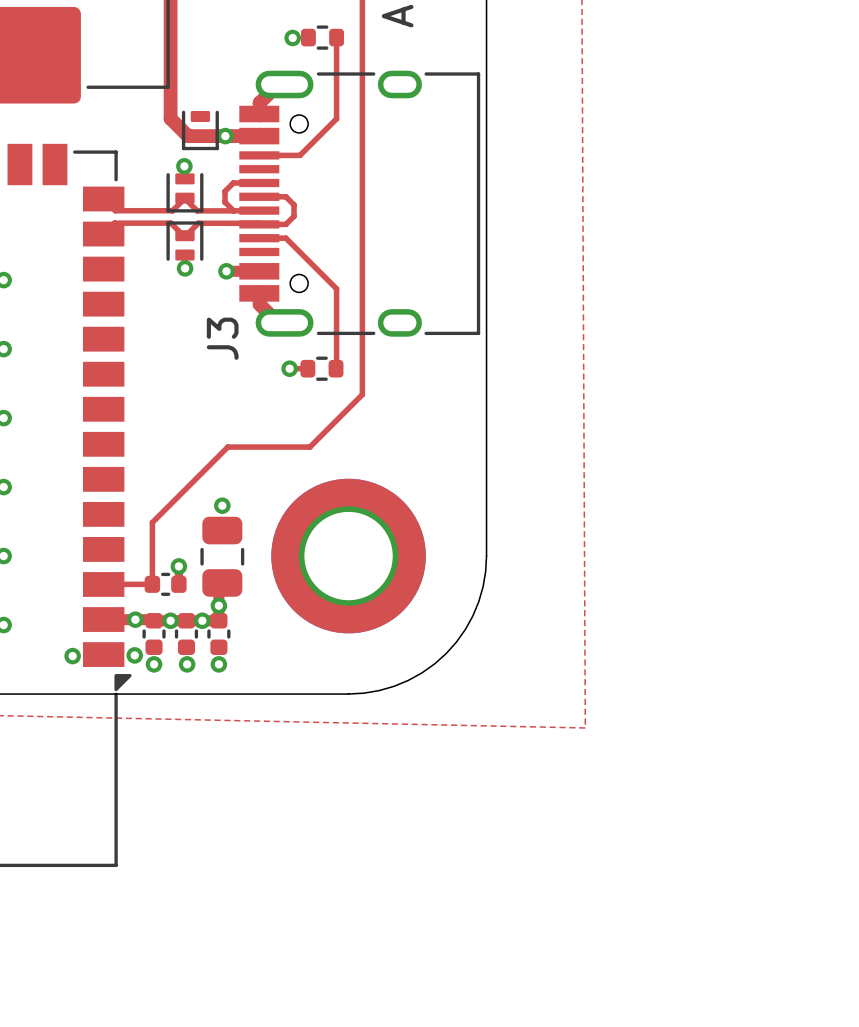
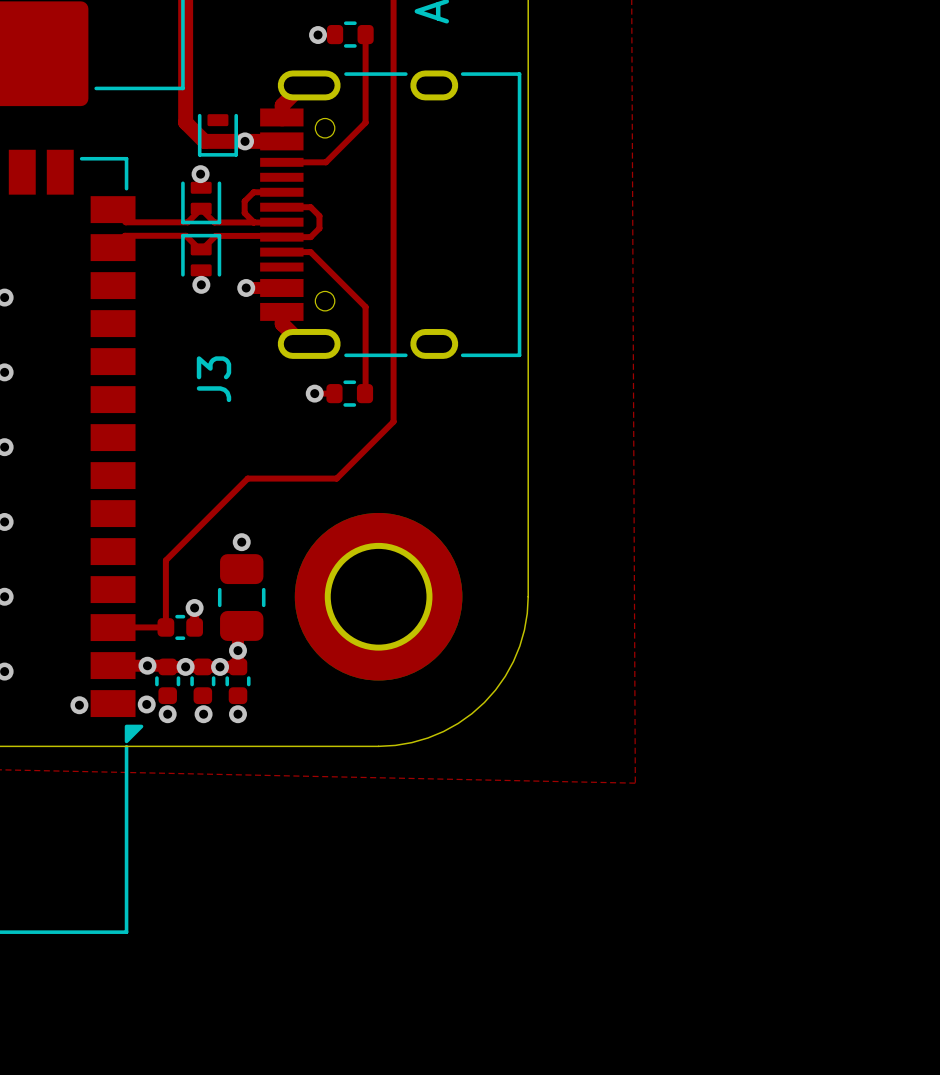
J3 name position: J3 (222, 338) -> J3 (213, 379)

